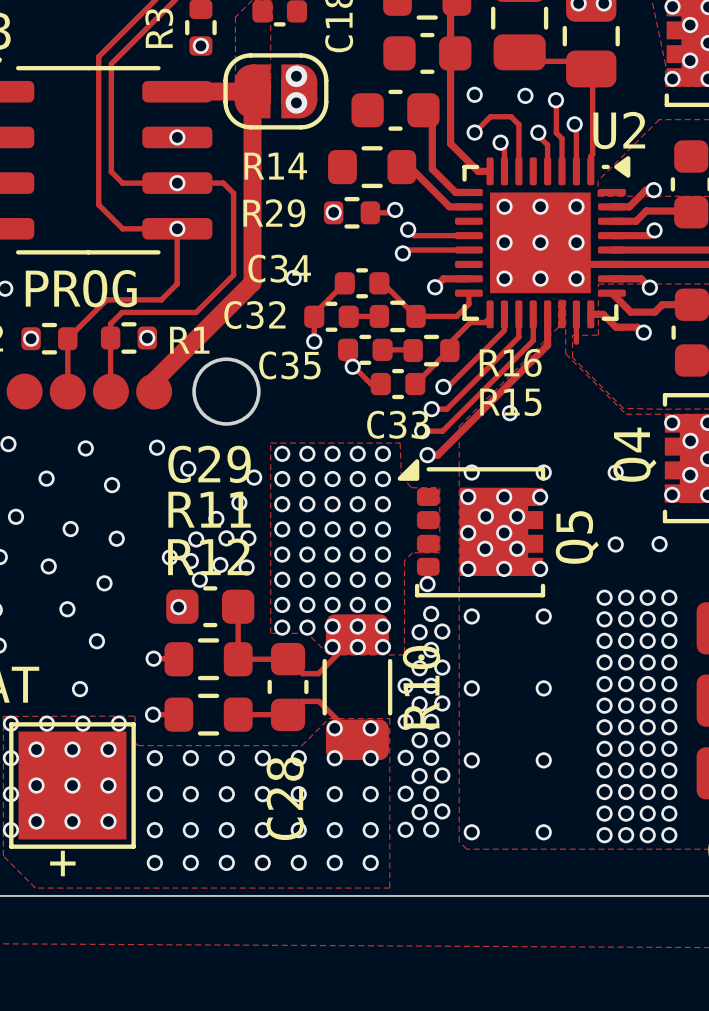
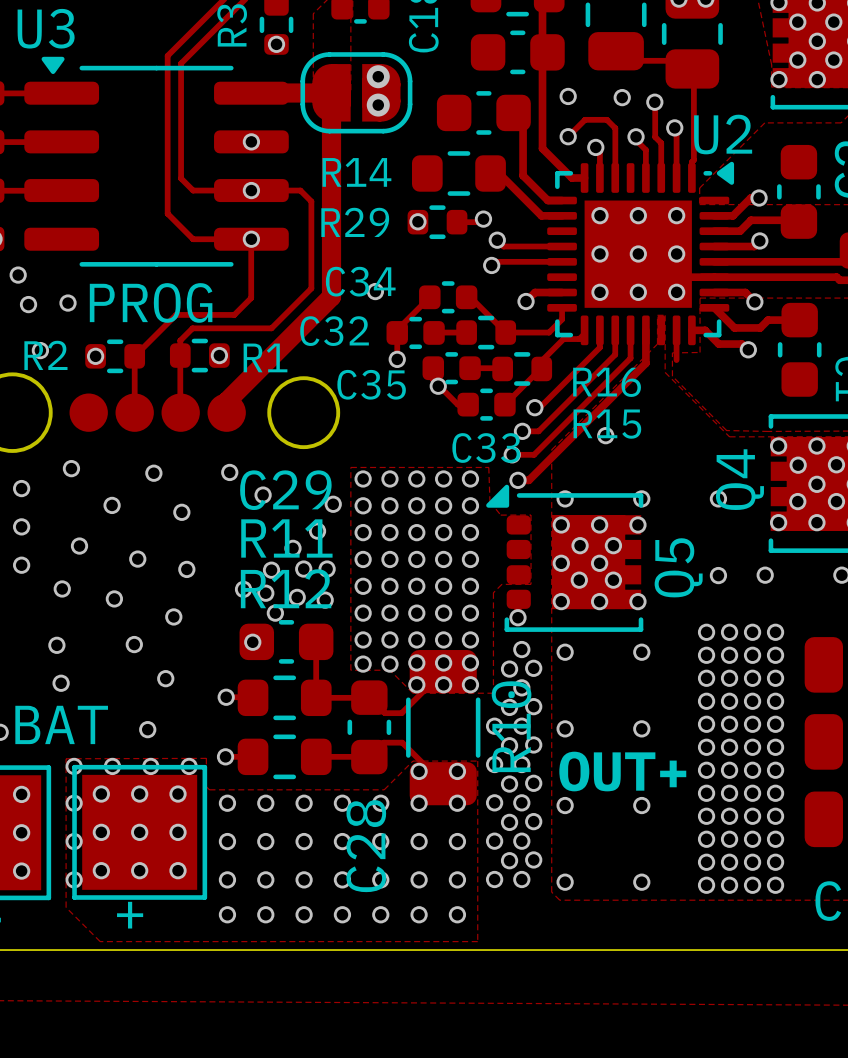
text: none -> OUT+ (622, 771)

